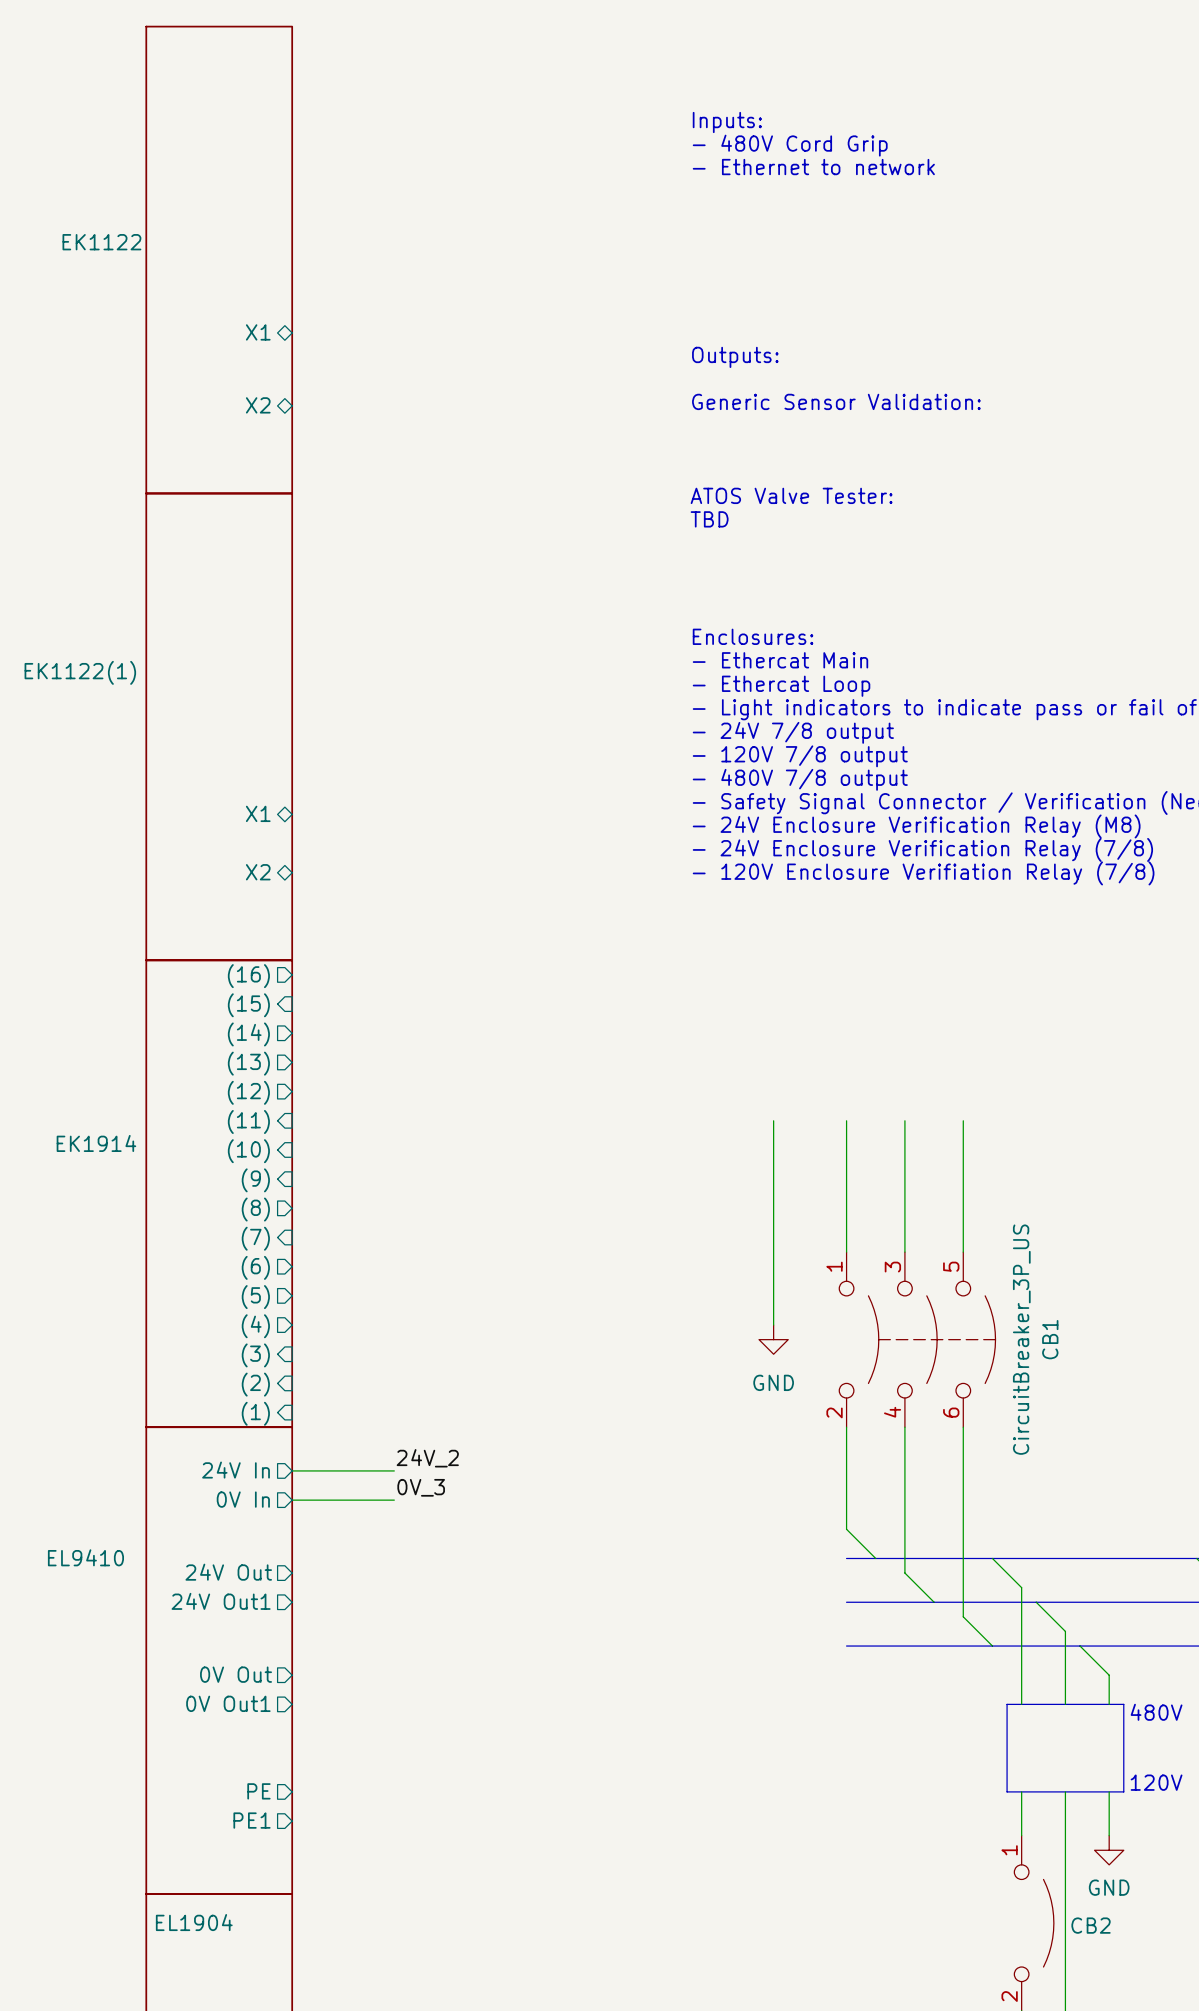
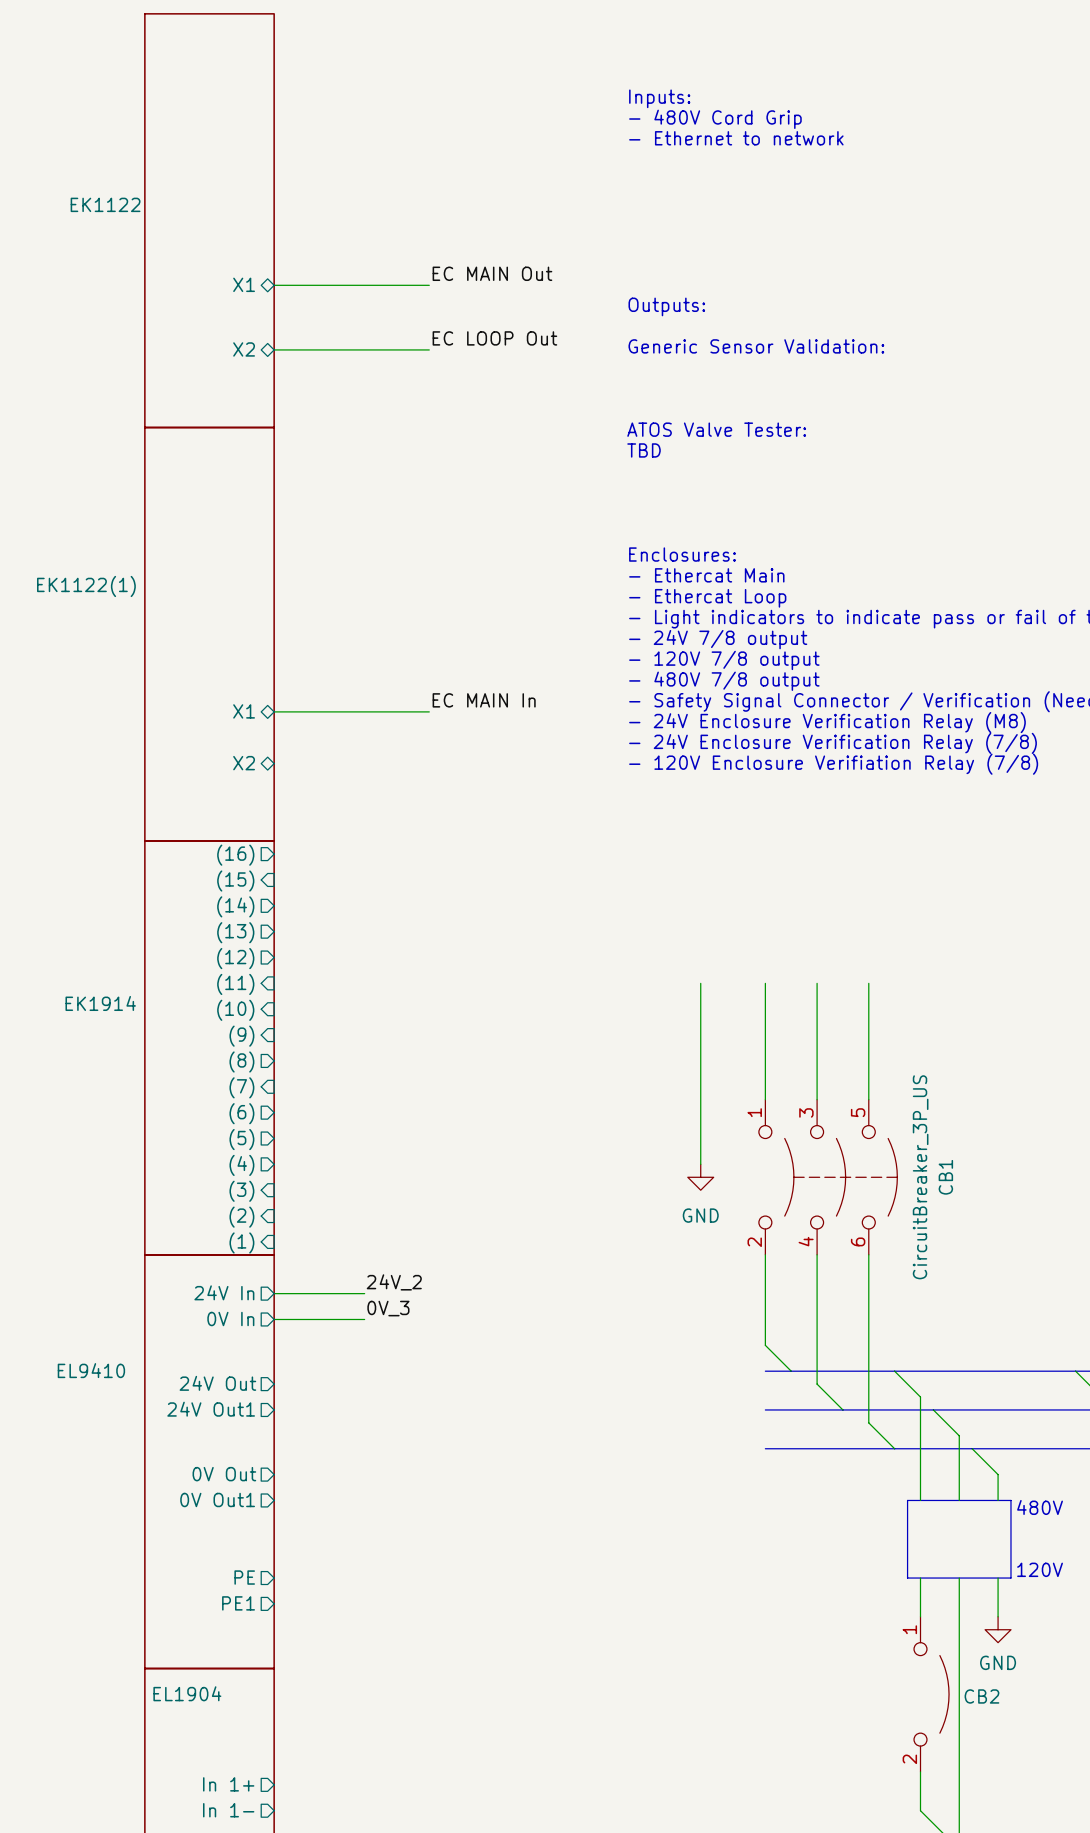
label: none -> EC MAIN Out (492, 273)
wire: none -> (274, 285) (429, 285)
label: none -> EC LOOP Out (494, 338)
wire: none -> (274, 349) (429, 349)
label: none -> EC MAIN In (484, 700)
wire: none -> (274, 711) (429, 711)

